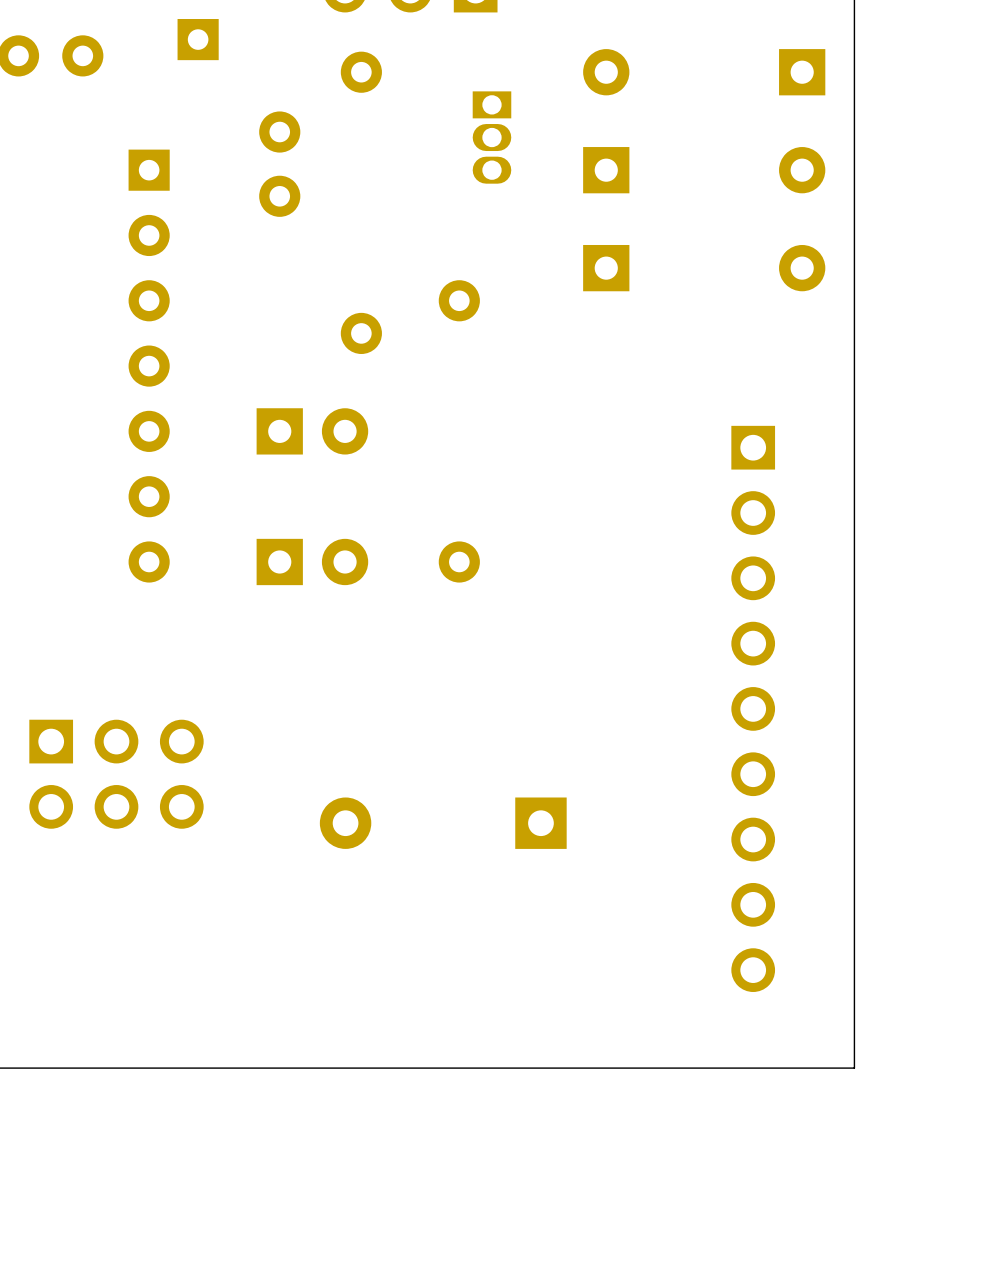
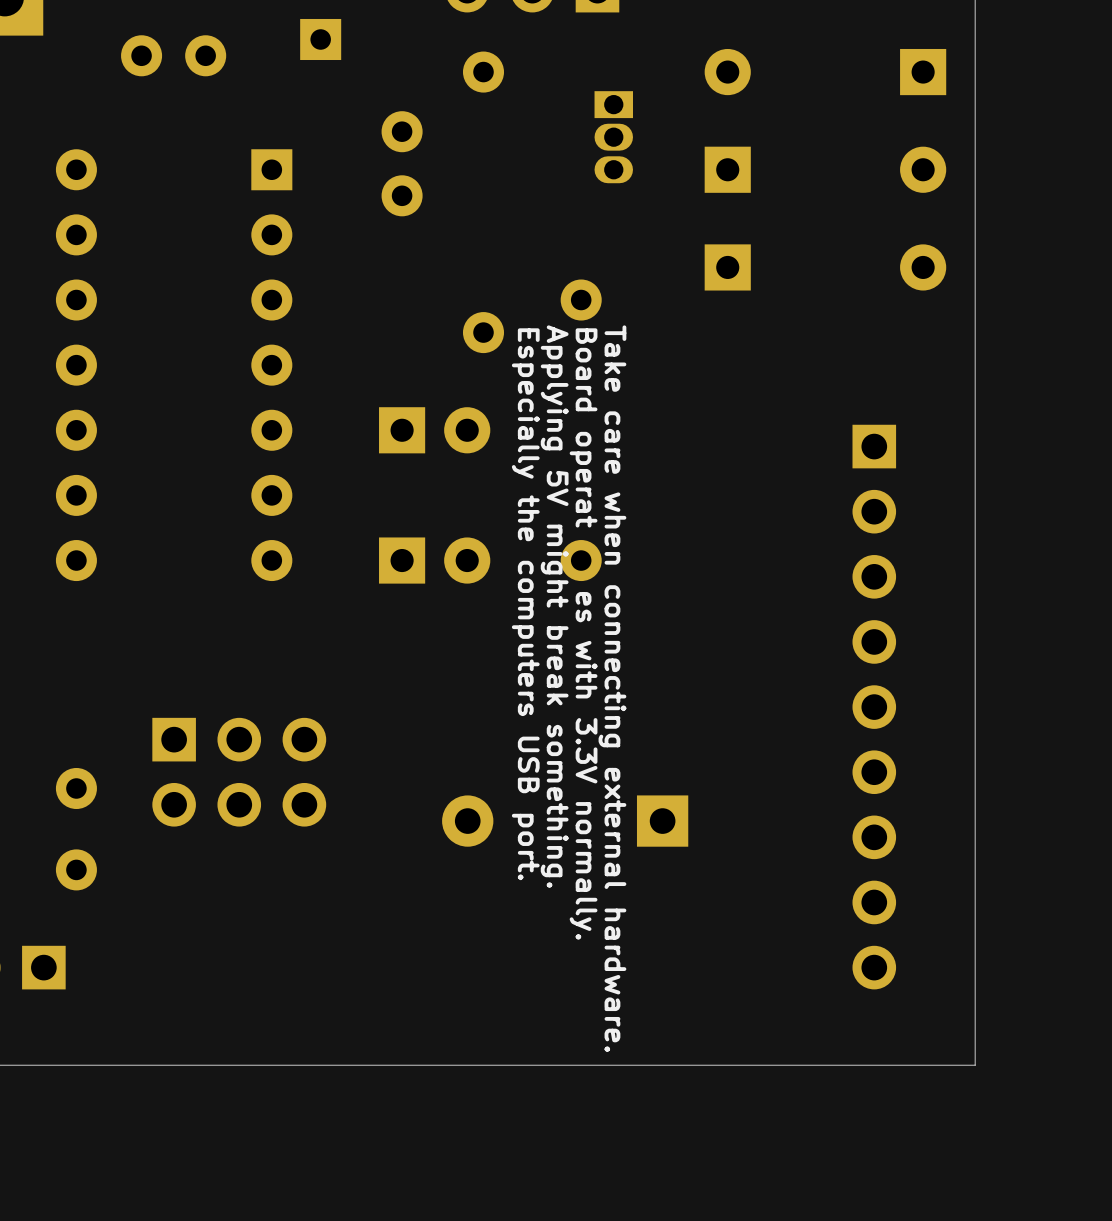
text: none -> Especially the computers USB port. (525, 604)
text: none -> Applying 5V might break something. (554, 606)
text: none -> Board operat es with 3.3V normally. (583, 634)
text: none -> Take care when connecting external hardware. (612, 688)

